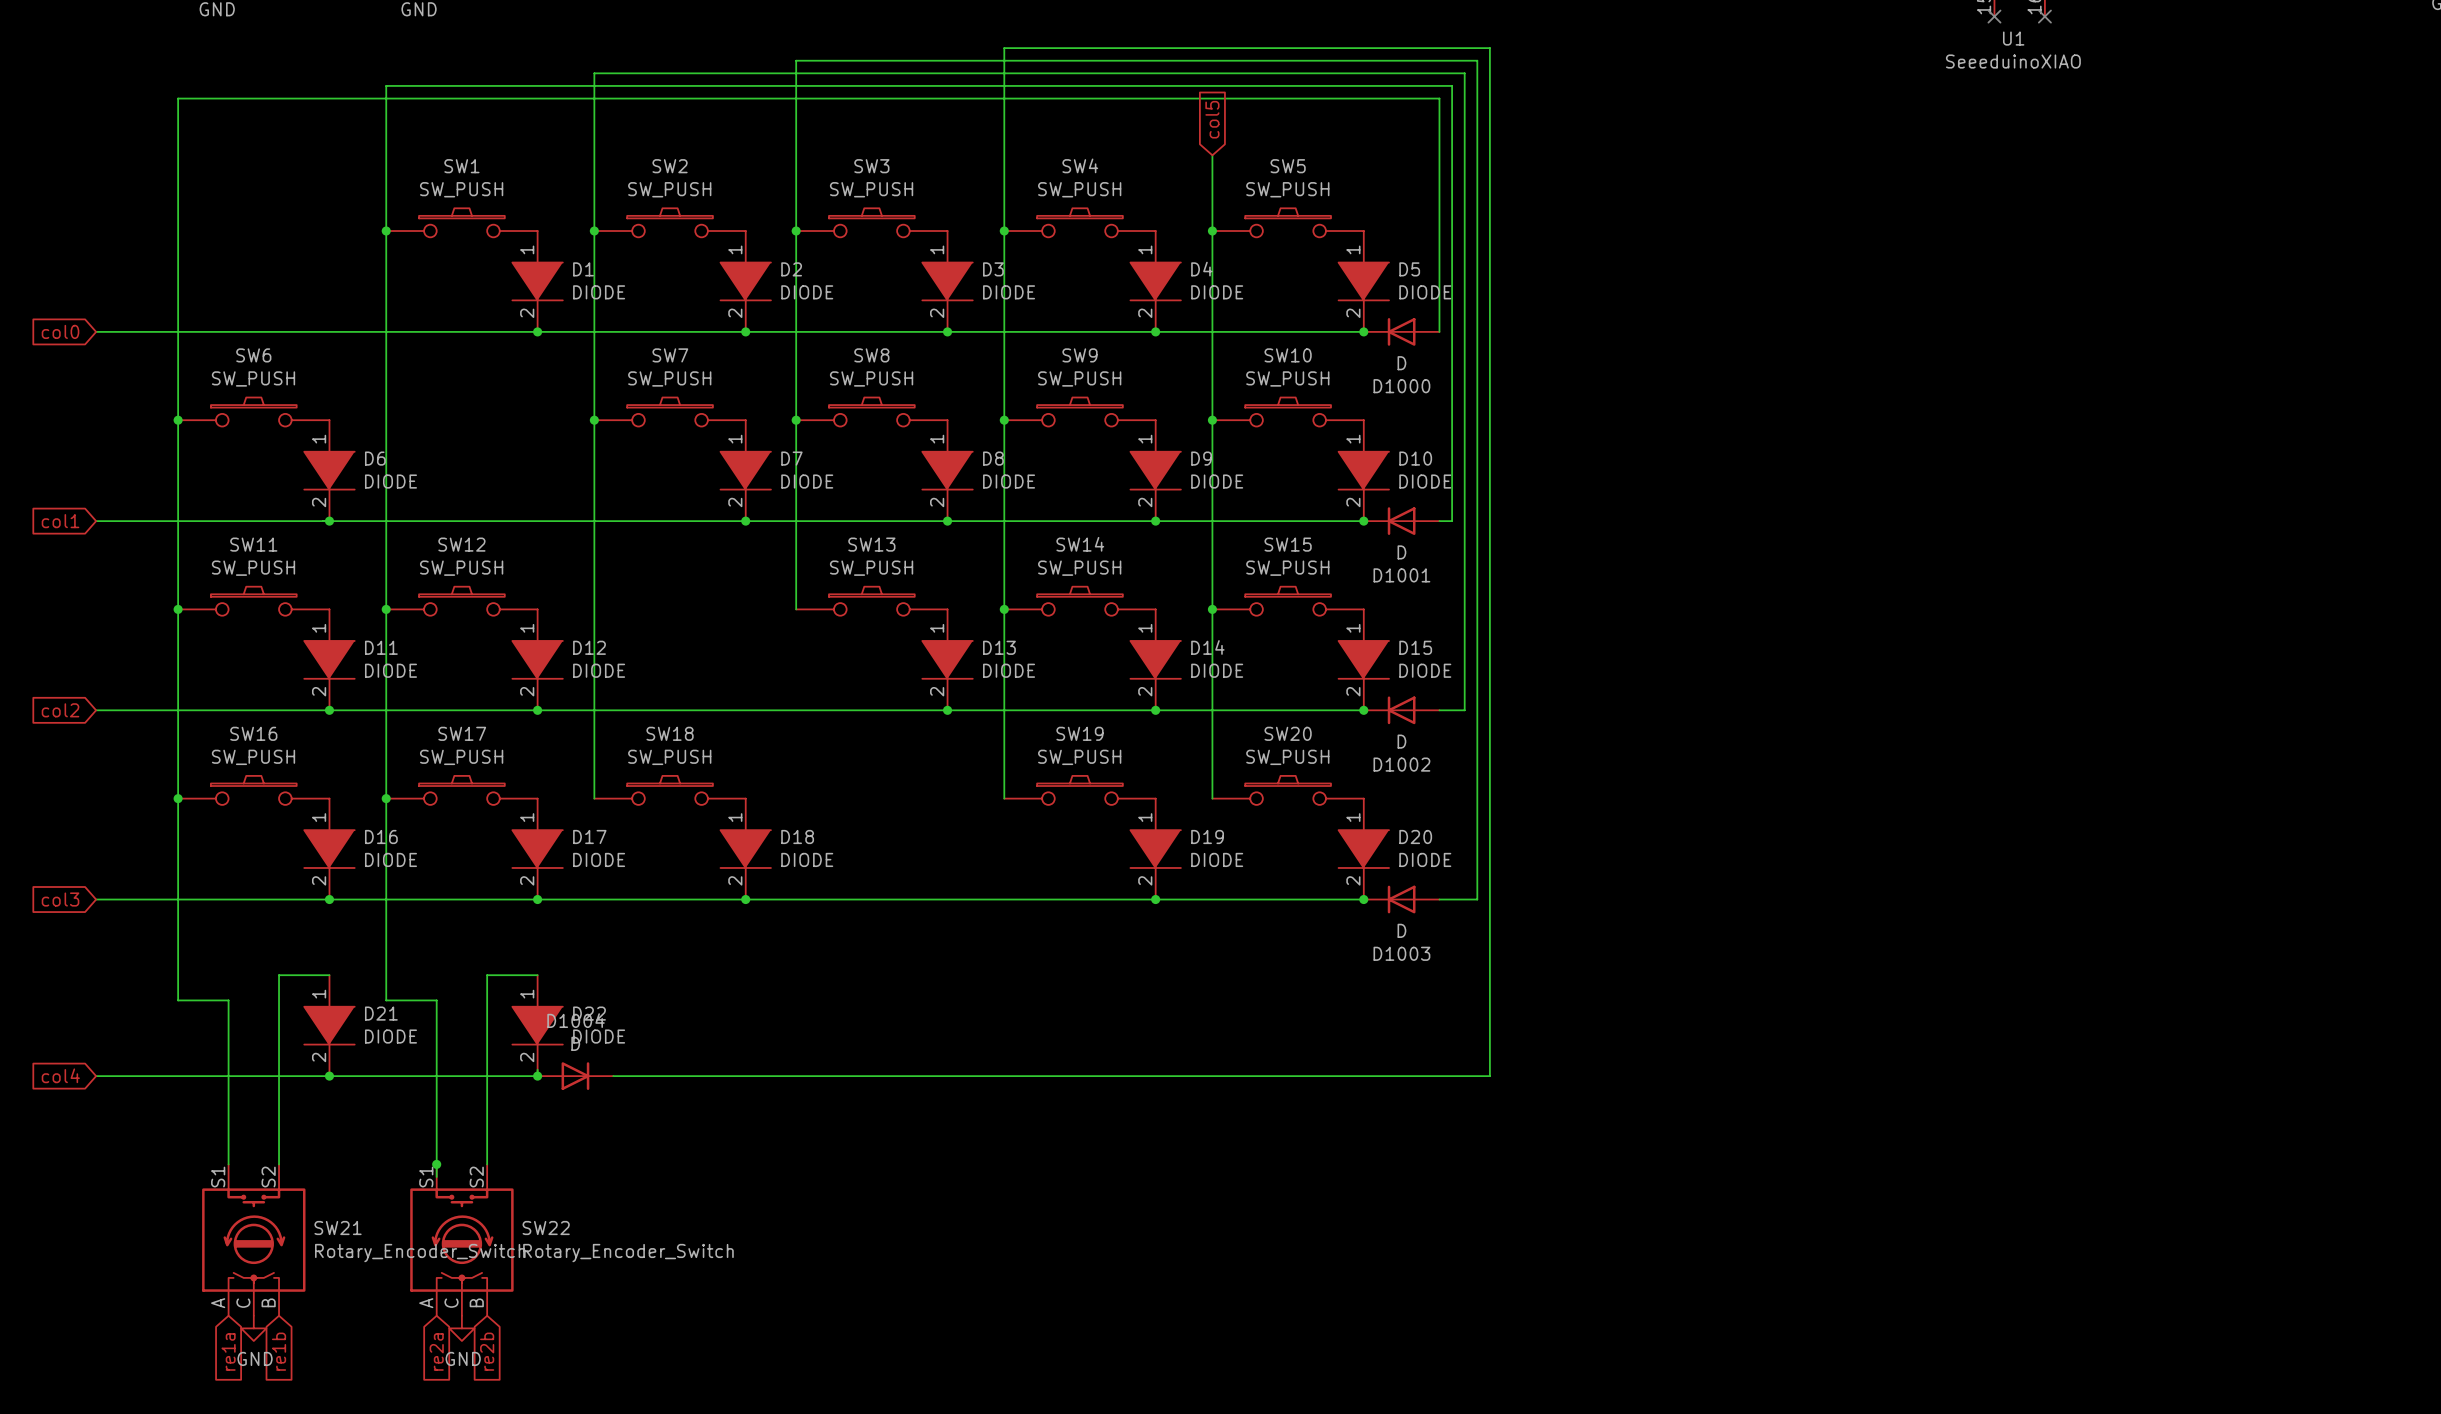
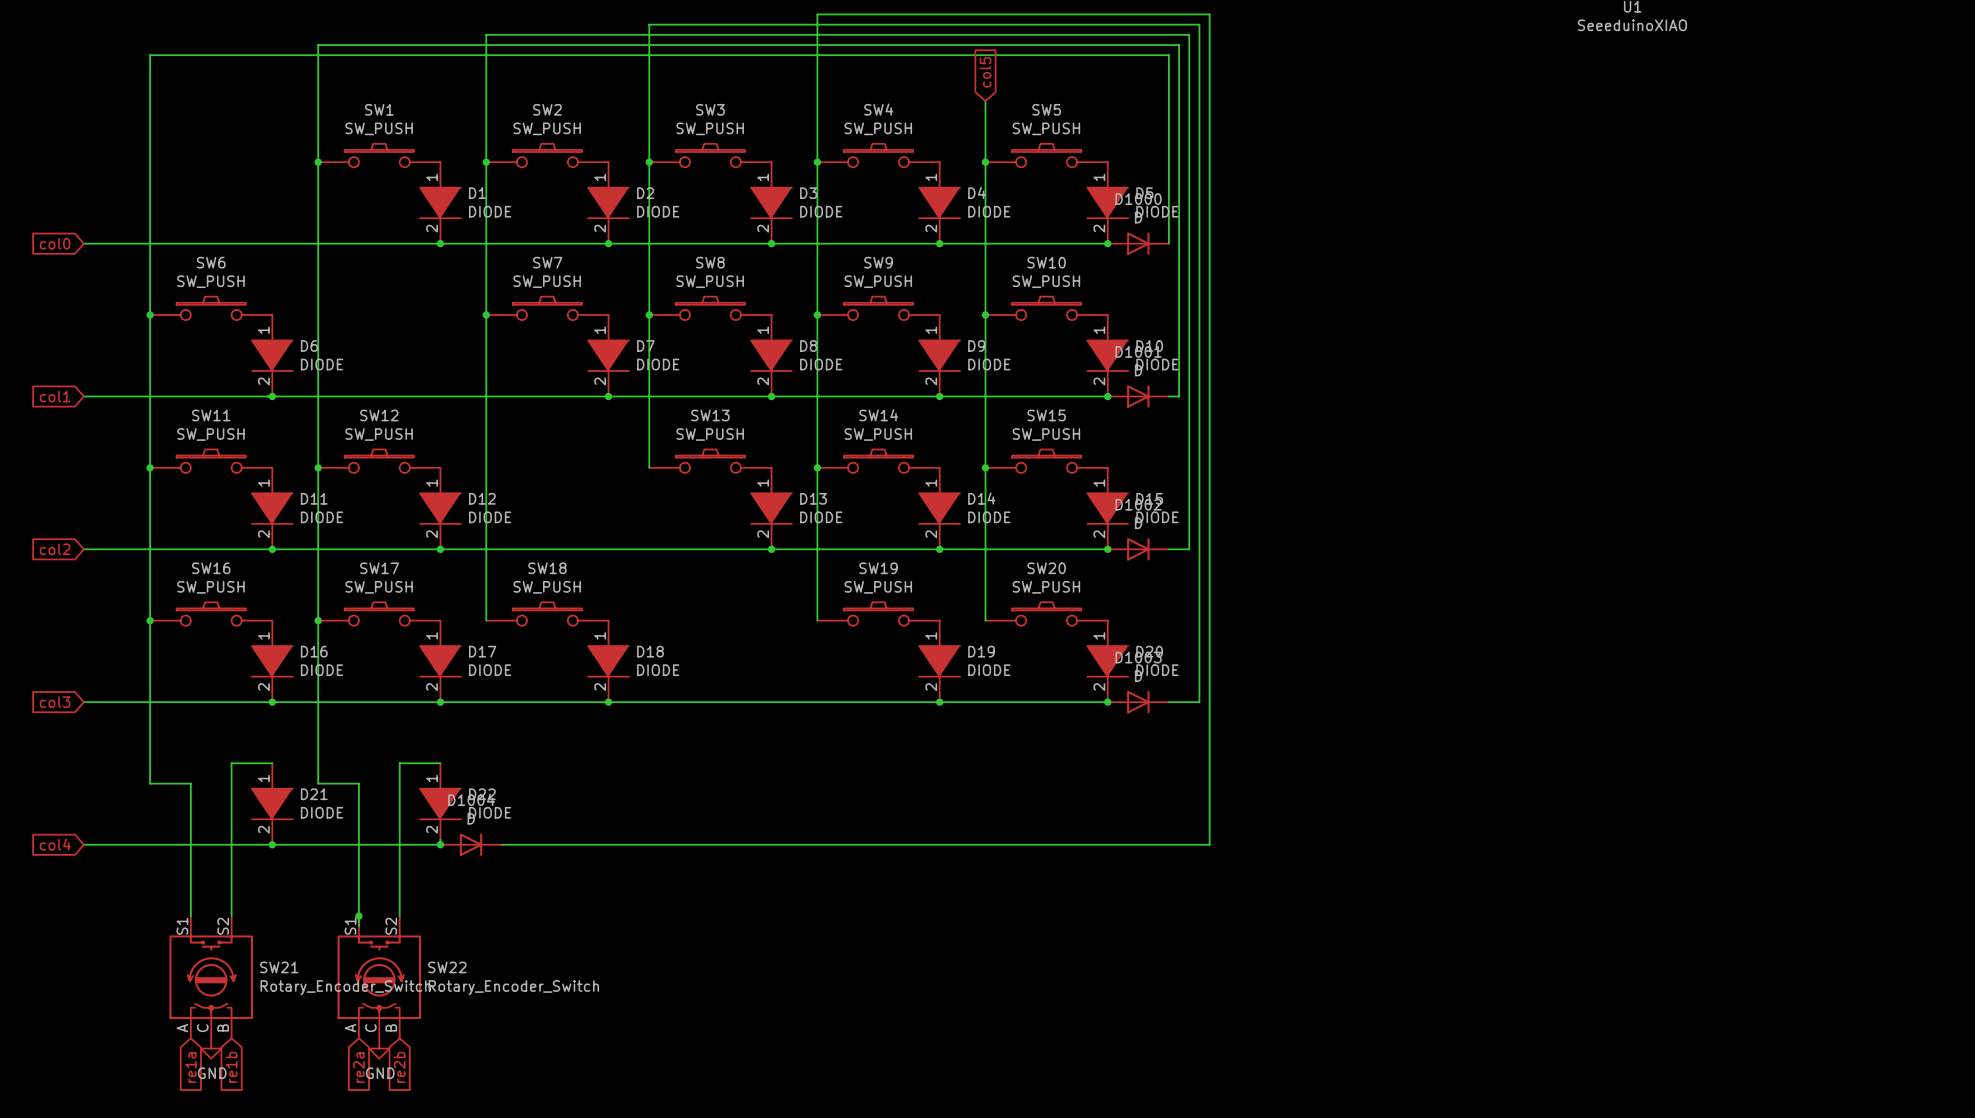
D1000 rotation: 0° (1401, 331) -> 180° (1138, 243)
D1001 rotation: 0° (1401, 521) -> 180° (1138, 396)
D1002 rotation: 0° (1401, 710) -> 180° (1138, 549)
D1003 rotation: 0° (1401, 899) -> 180° (1138, 702)

